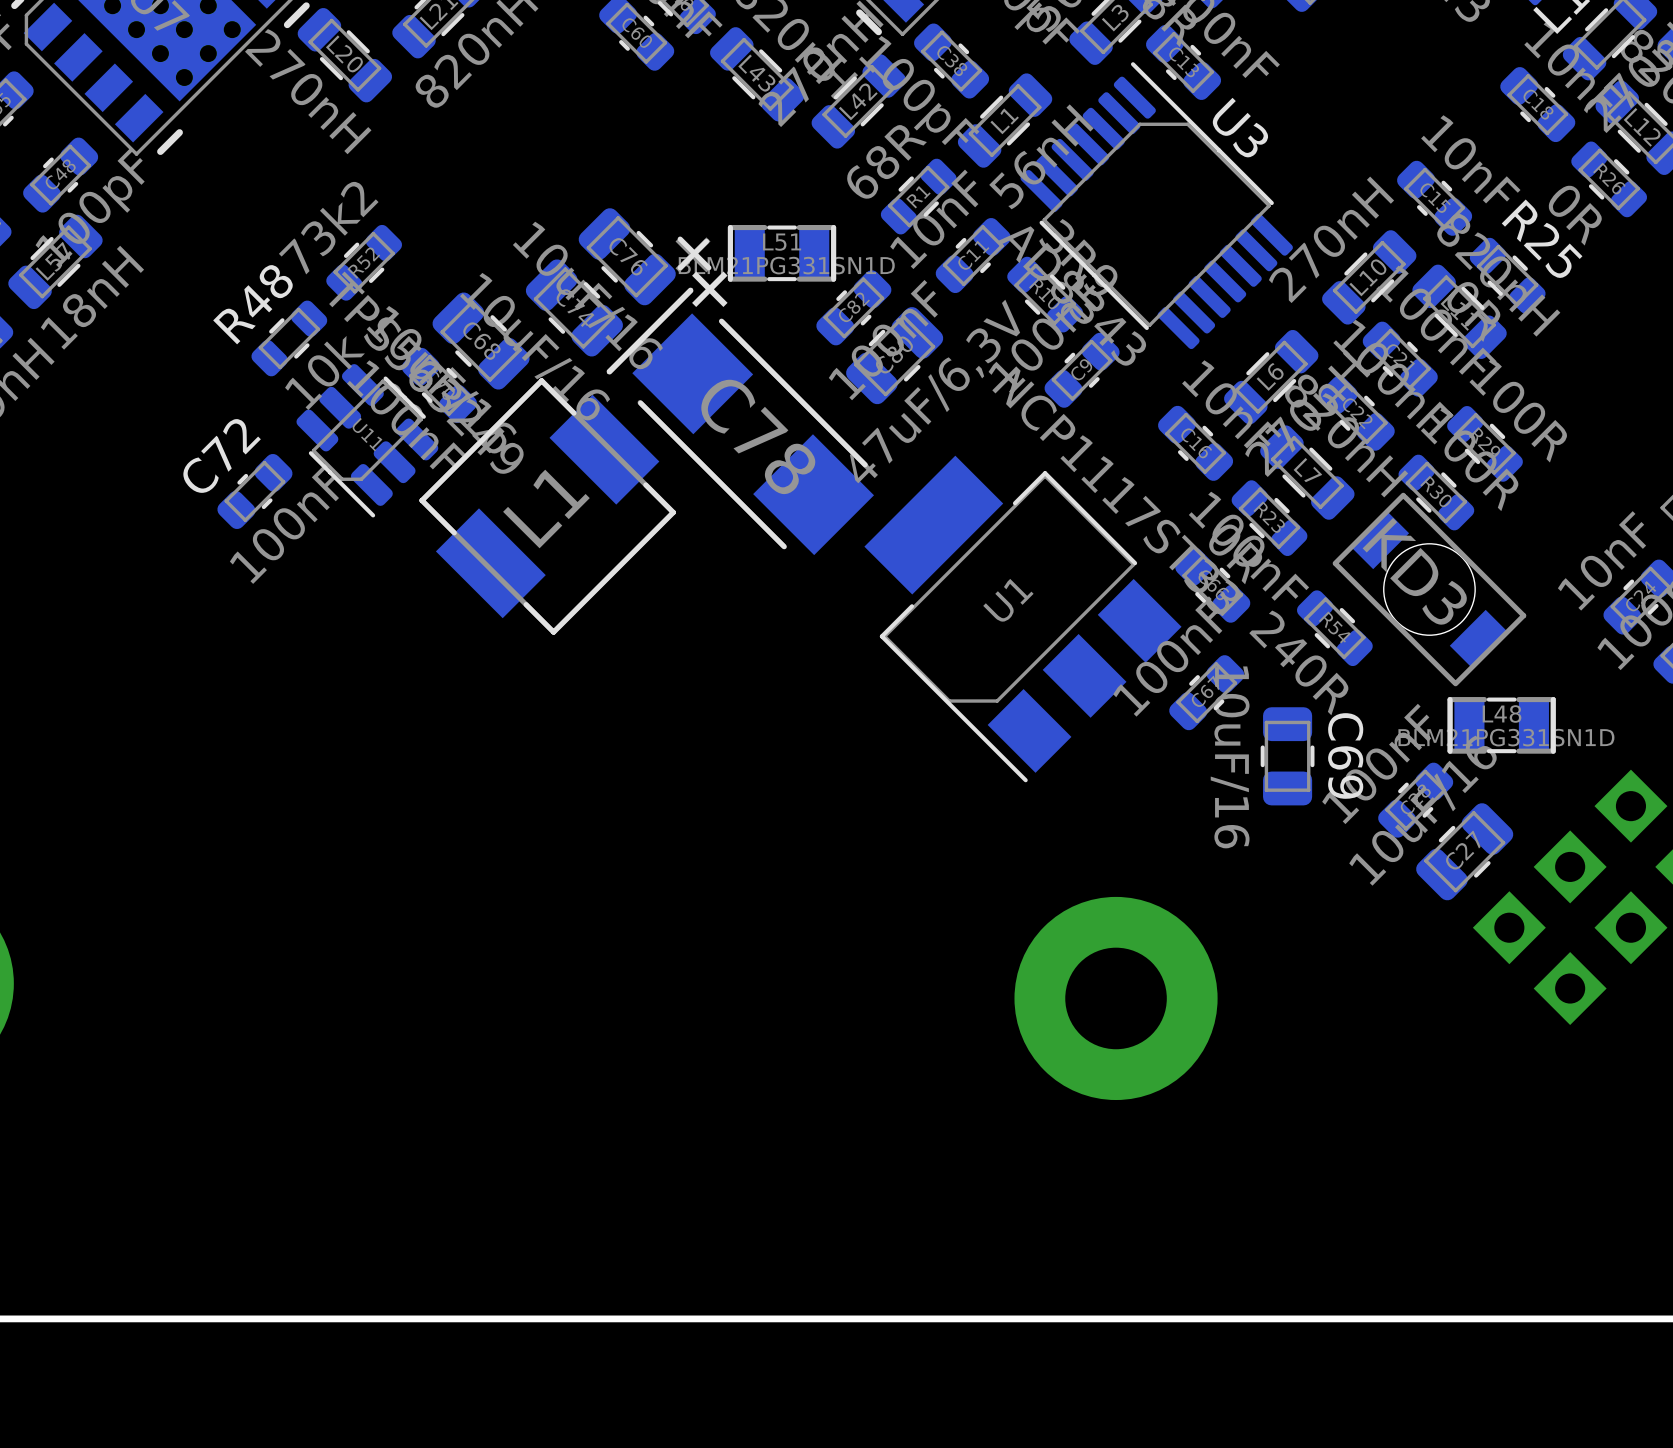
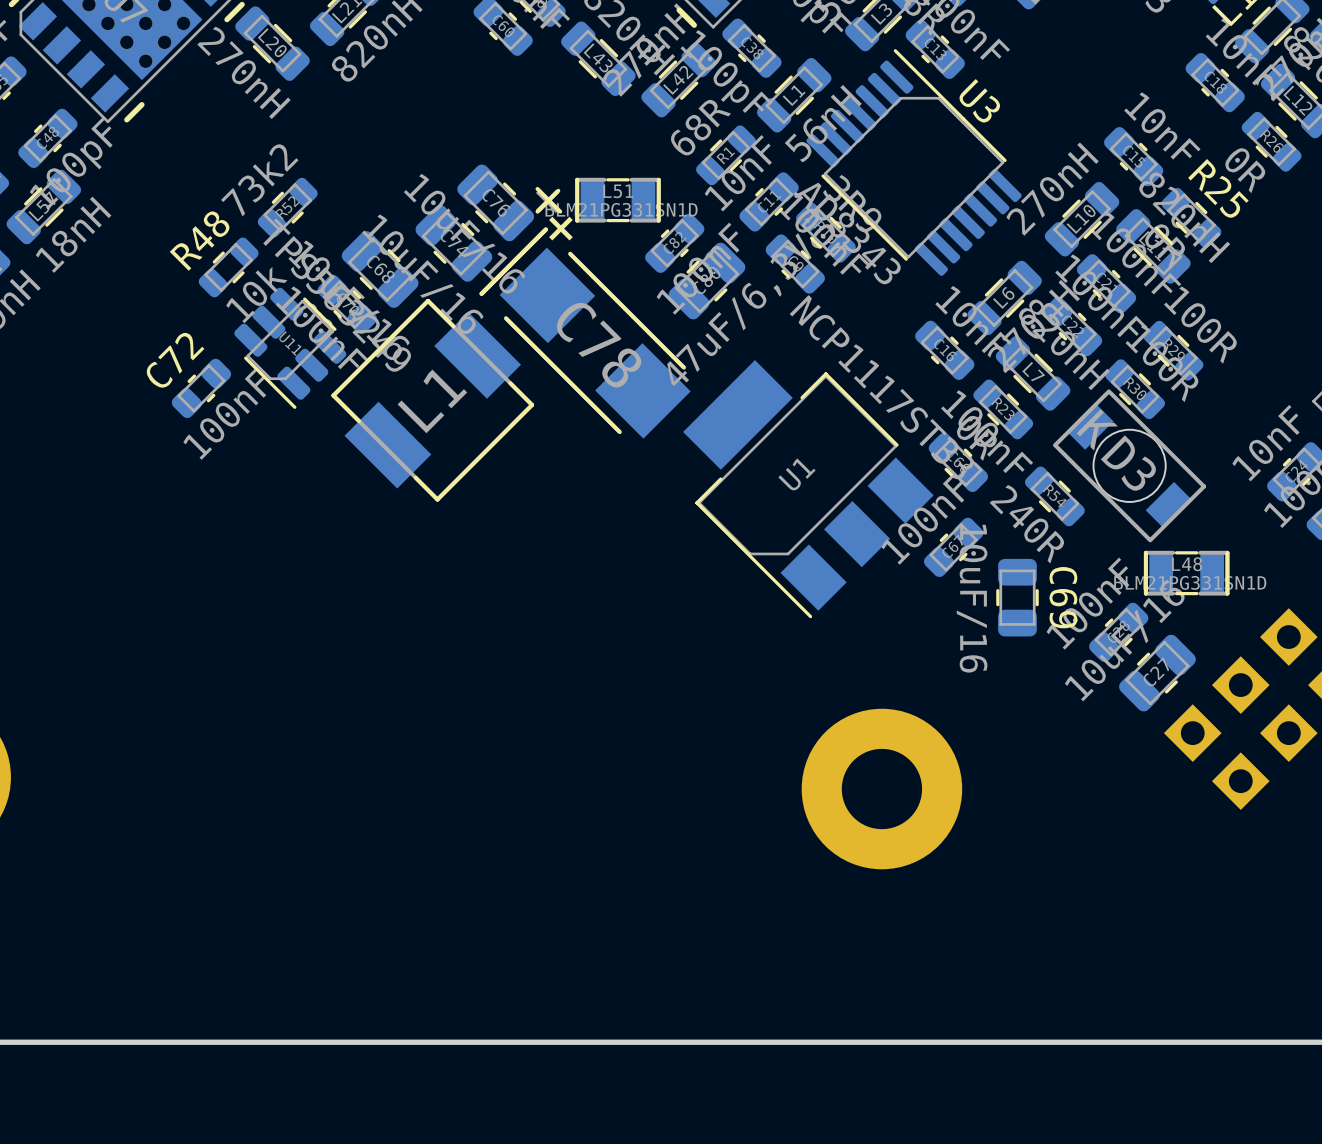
C9 rotation: 0° (1082, 370) -> 90° clockwise (795, 264)
C9 position: (1082, 370) -> (795, 264)

